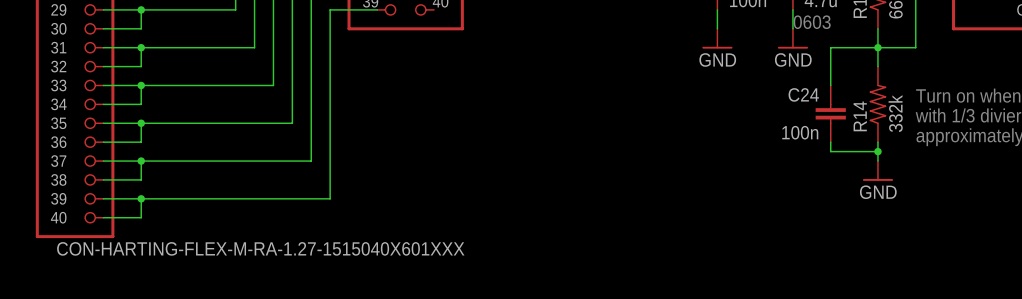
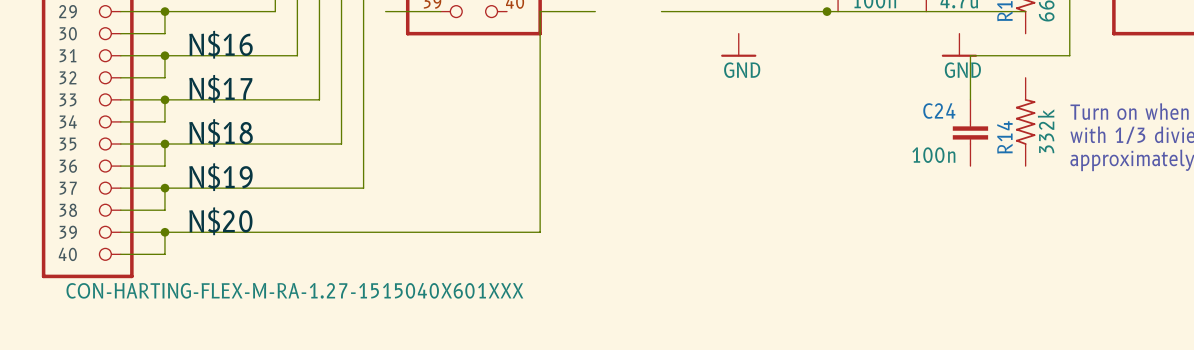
wire: (330, 9) (330, 198) -> (595, 11) (540, 11) (540, 232) (385, 232)
wire: none -> (661, 11) (1025, 11)
junction: none -> (827, 11)
wire: (717, 9) (717, 28) -> none
wire: (792, 9) (792, 28) -> none
text: 0603 (812, 22) -> none
wire: (877, 28) (877, 66) -> none
label: none -> N$16 (220, 44)
power symbol: none -> GND (738, 45)
power symbol: GND (717, 38) -> none
power symbol position: GND (792, 38) -> GND (959, 45)
junction: (877, 47) -> none
power symbol text position: GND (793, 59) -> GND (962, 70)
label: none -> N$17 (220, 88)
label: none -> N$18 (221, 132)
wire: (830, 142) (830, 151) (877, 151) -> none
wire: (877, 142) (877, 161) -> none
label: none -> N$19 (220, 177)
junction: (877, 151) -> none
power symbol: GND (877, 170) -> none
label: none -> N$20 (220, 221)

